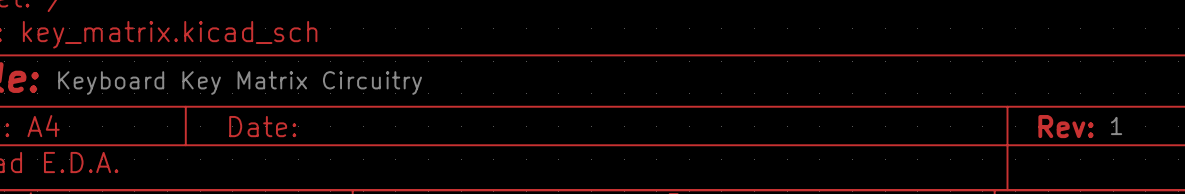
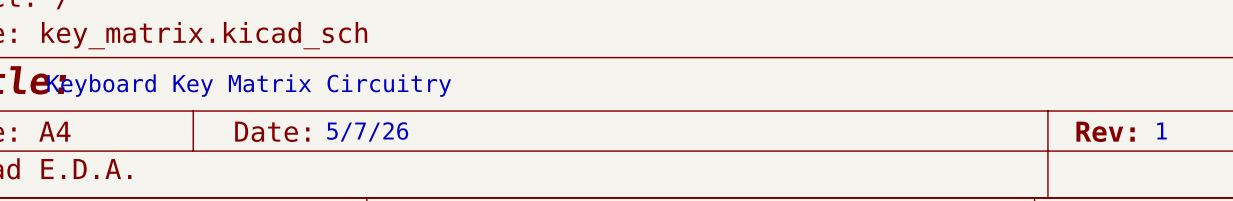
text: none -> 5/7/26 (367, 131)

